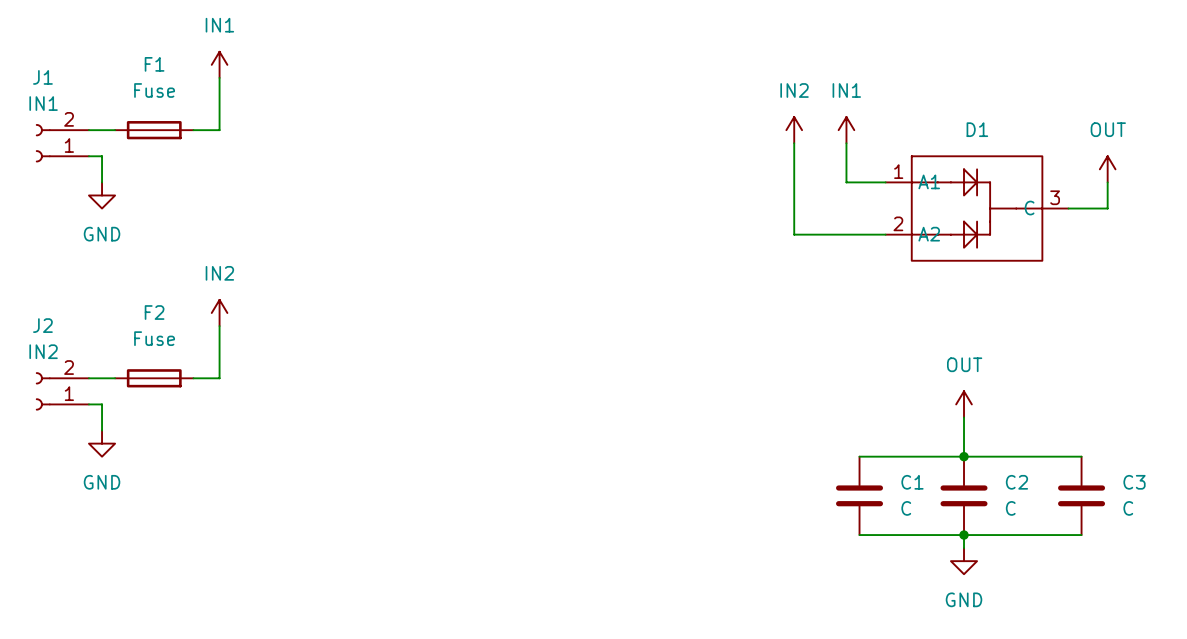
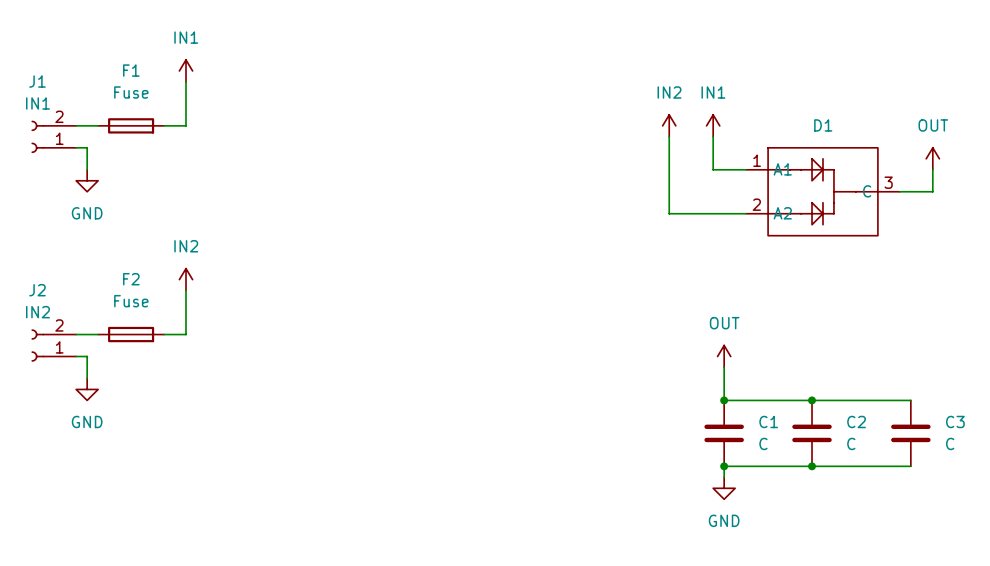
power symbol position: OUT (964, 404) -> OUT (724, 356)
wire: (964, 417) (964, 456) -> (724, 367) (724, 400)
junction: none -> (724, 400)
junction: none -> (724, 466)
wire: (964, 535) (964, 548) -> (724, 466) (724, 477)
power symbol position: GND (964, 561) -> GND (724, 488)

